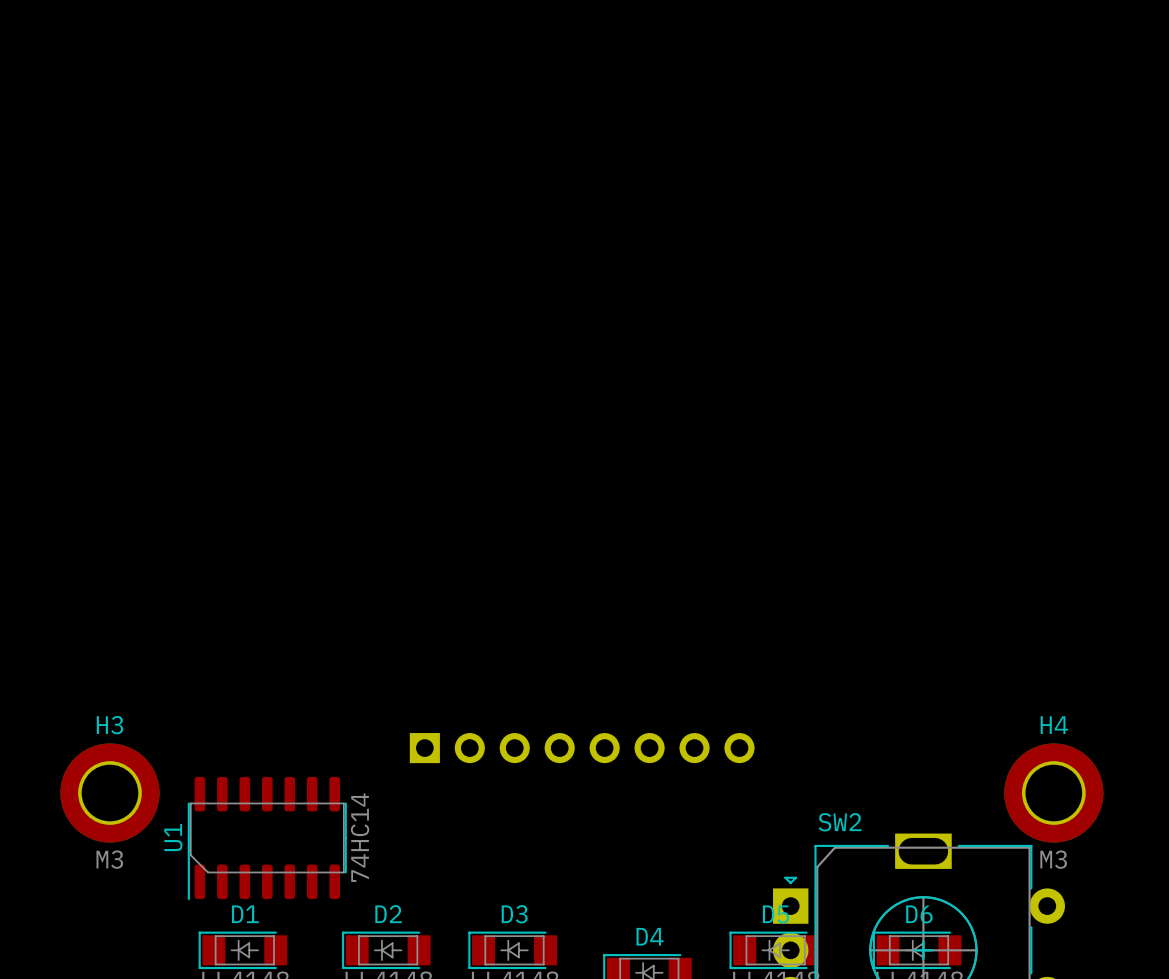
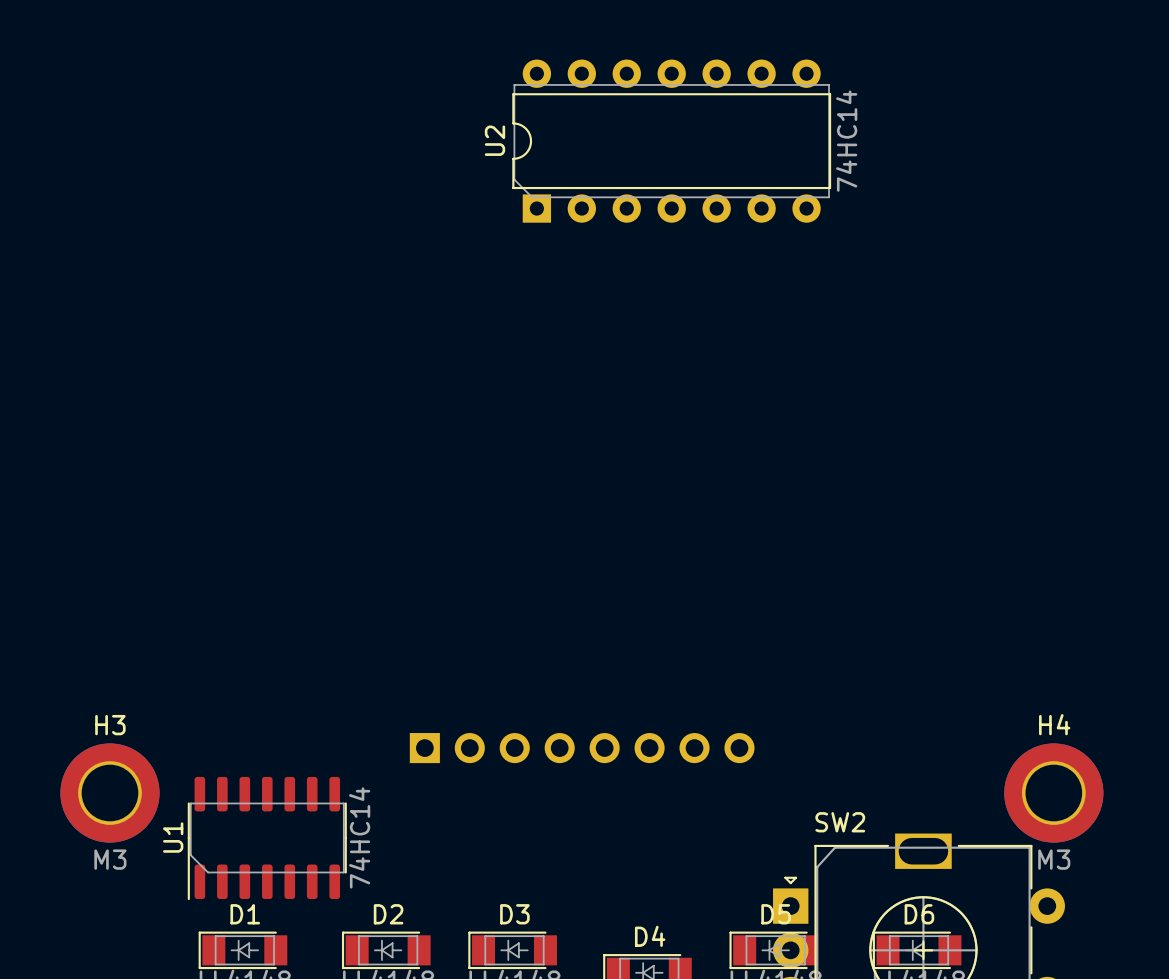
U2: none -> 74HC14 (671, 141)

